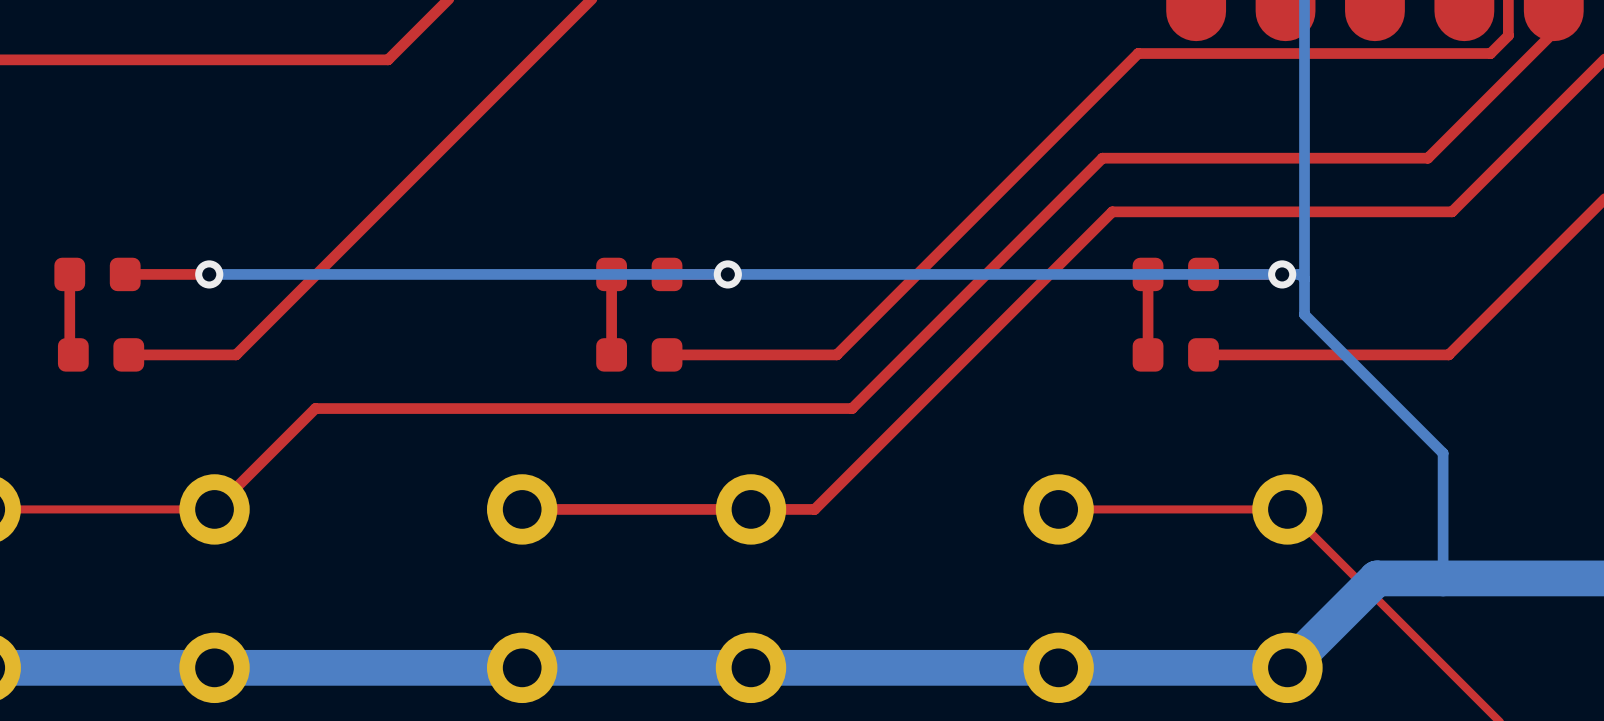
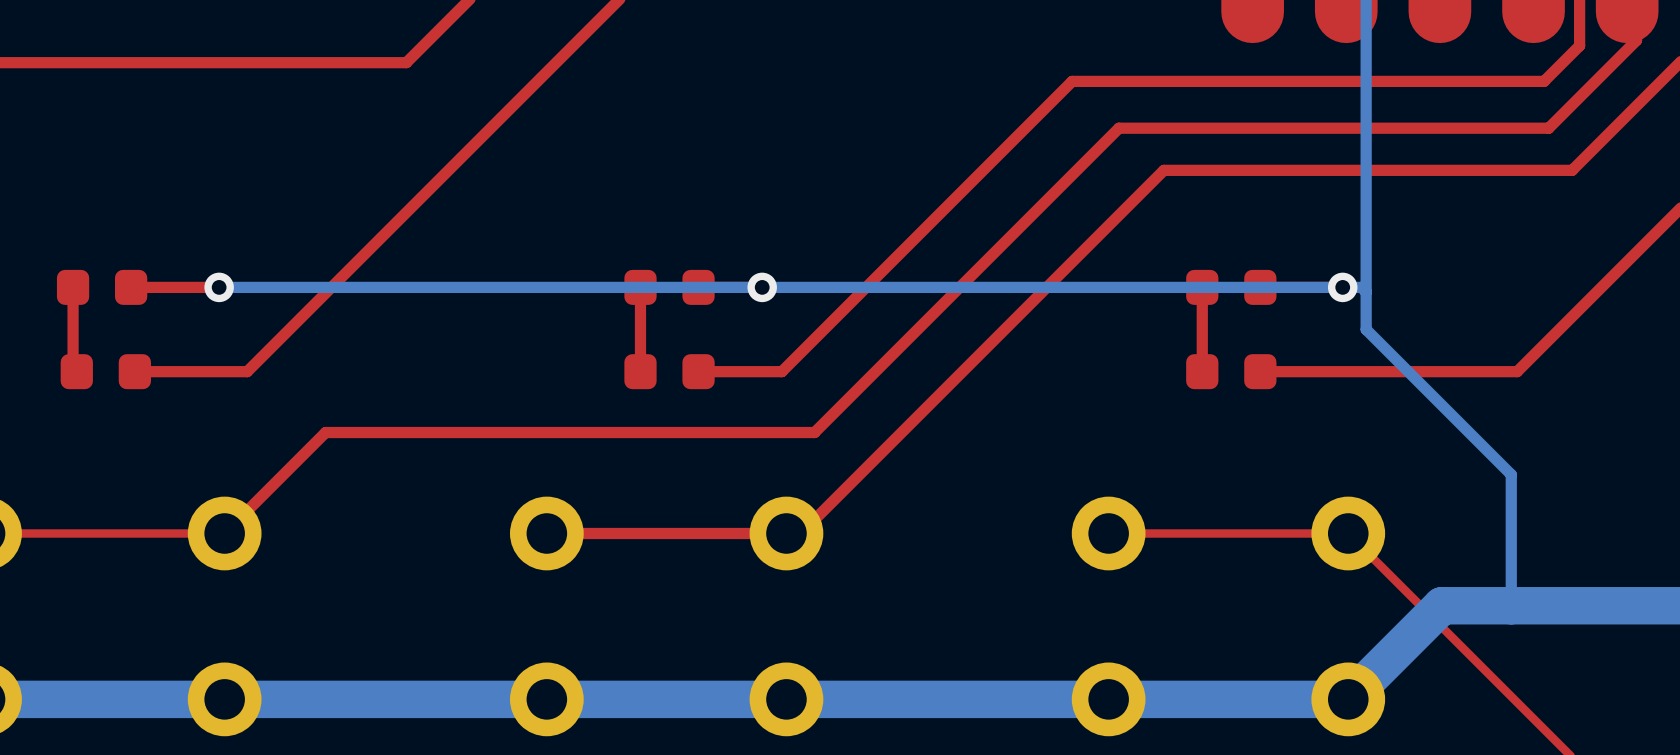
top track: (1562, 23) (1427, 158) (1102, 158) (852, 408) (315, 408) (310, 413) -> (1636, 24) (1636, 40) (1548, 128) (1118, 128) (814, 432) (325, 432)
top track: (1508, 35) (1490, 53) (1138, 53) (836, 354) (746, 354) -> (1579, 37) (1579, 45) (1544, 81) (1072, 81) (781, 371)
top track: (1501, 162) (1452, 211) (1112, 211) (814, 509) (764, 509) -> (1572, 170) (1163, 170) (800, 533)

